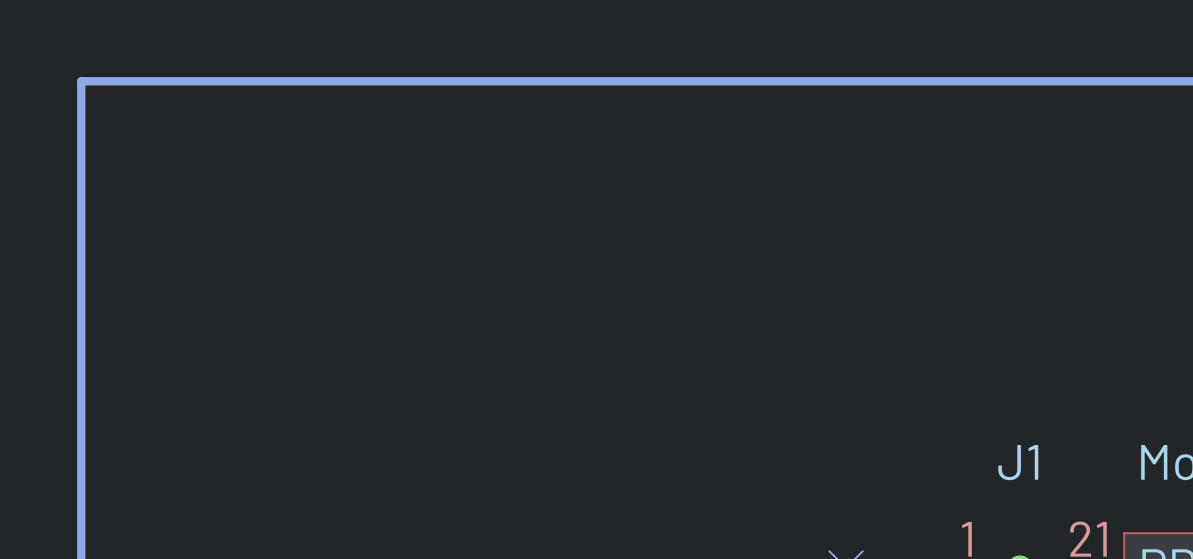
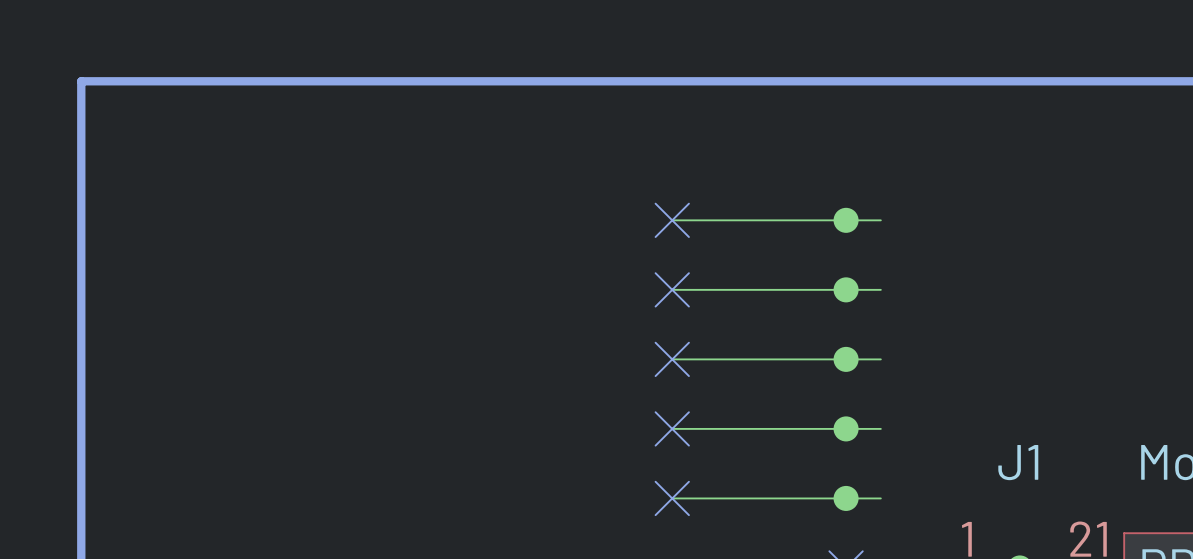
wire: none -> (672, 220) (880, 220)
no-connect mark: none -> (672, 220)
junction: none -> (846, 220)
wire: none -> (672, 289) (880, 289)
no-connect mark: none -> (672, 289)
junction: none -> (846, 289)
wire: none -> (672, 359) (880, 359)
no-connect mark: none -> (672, 359)
junction: none -> (846, 359)
wire: none -> (672, 428) (880, 428)
no-connect mark: none -> (672, 428)
junction: none -> (846, 428)
wire: none -> (672, 498) (880, 498)
no-connect mark: none -> (672, 498)
junction: none -> (846, 498)

